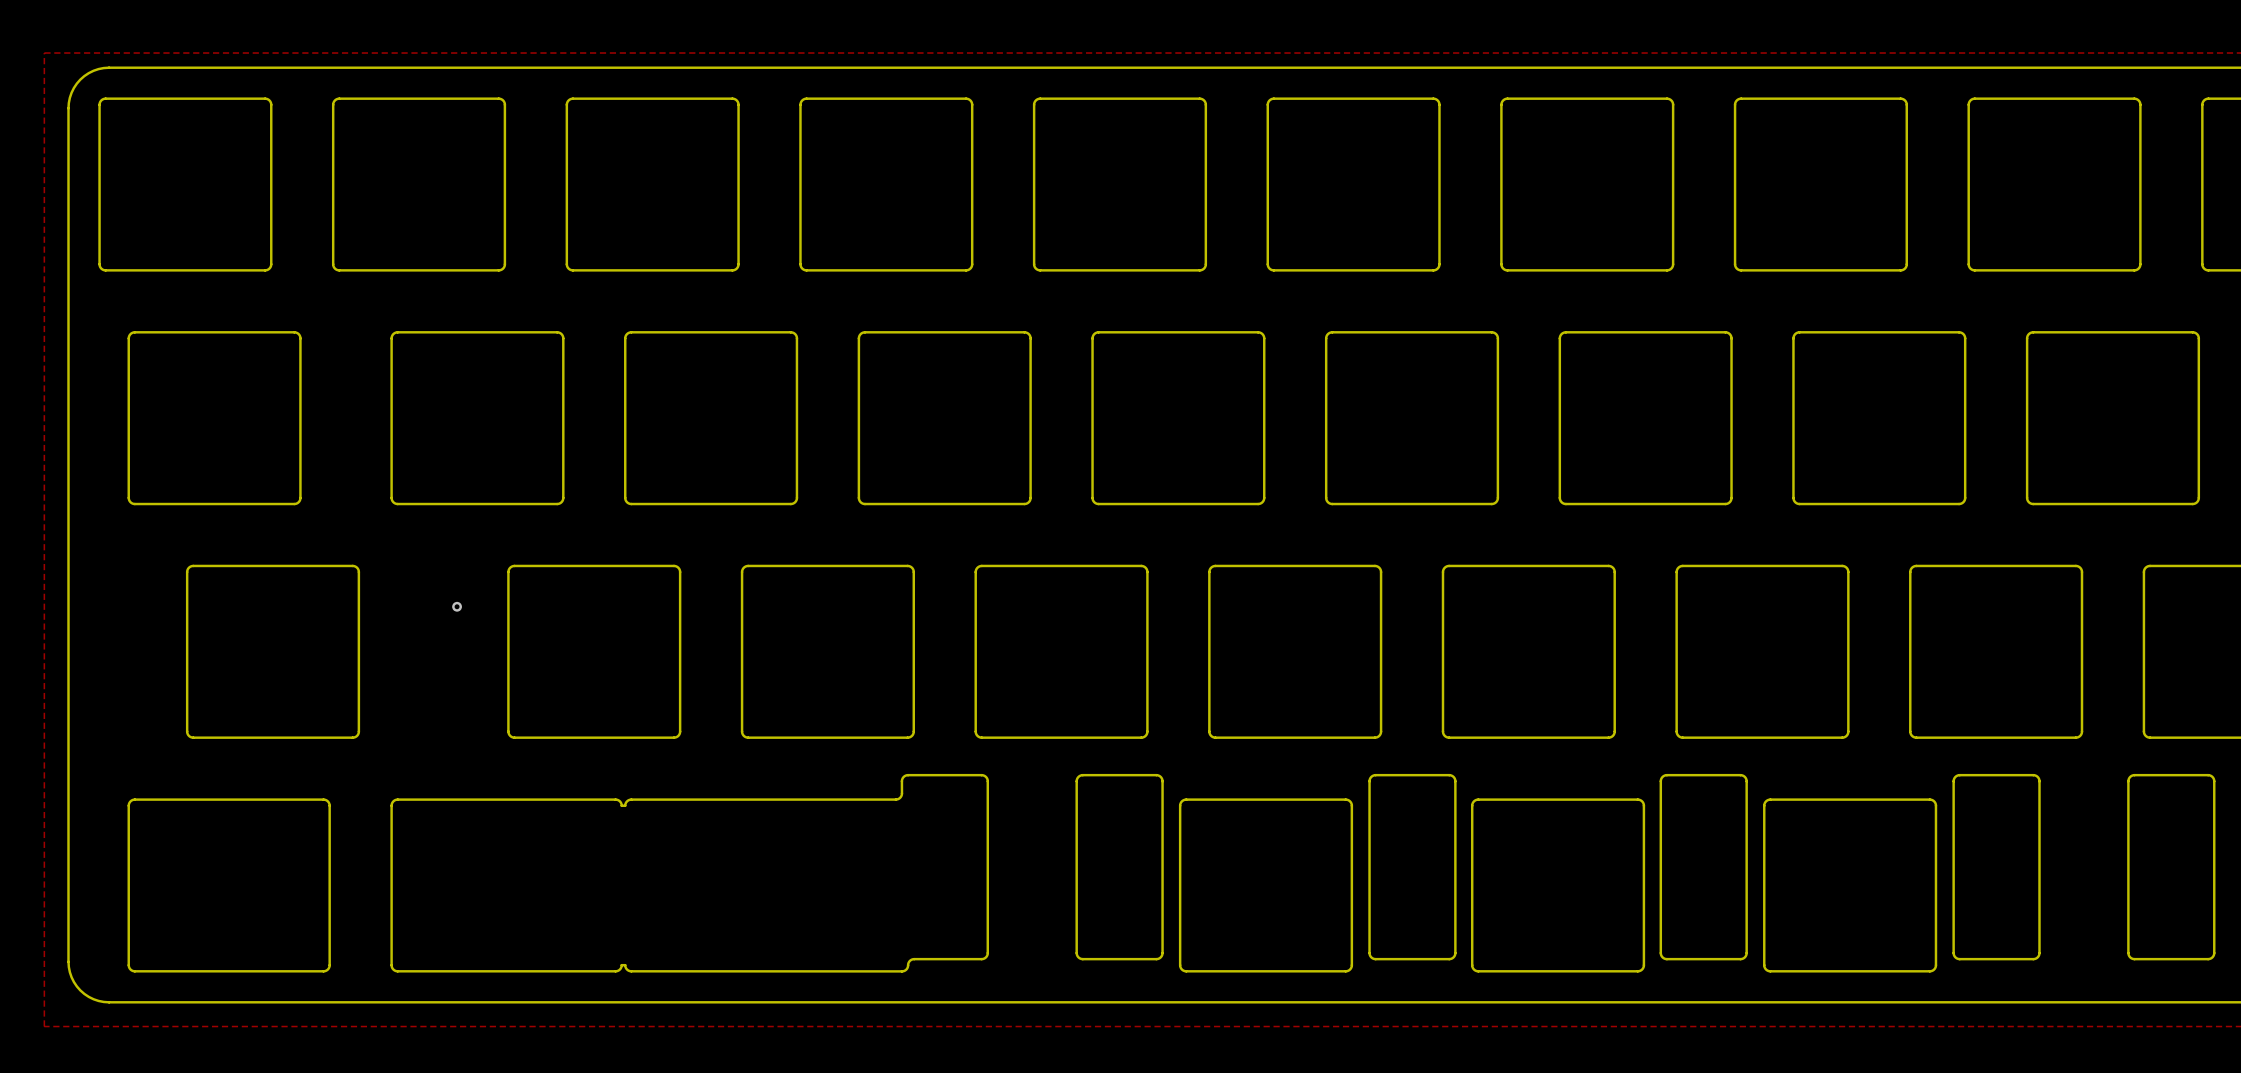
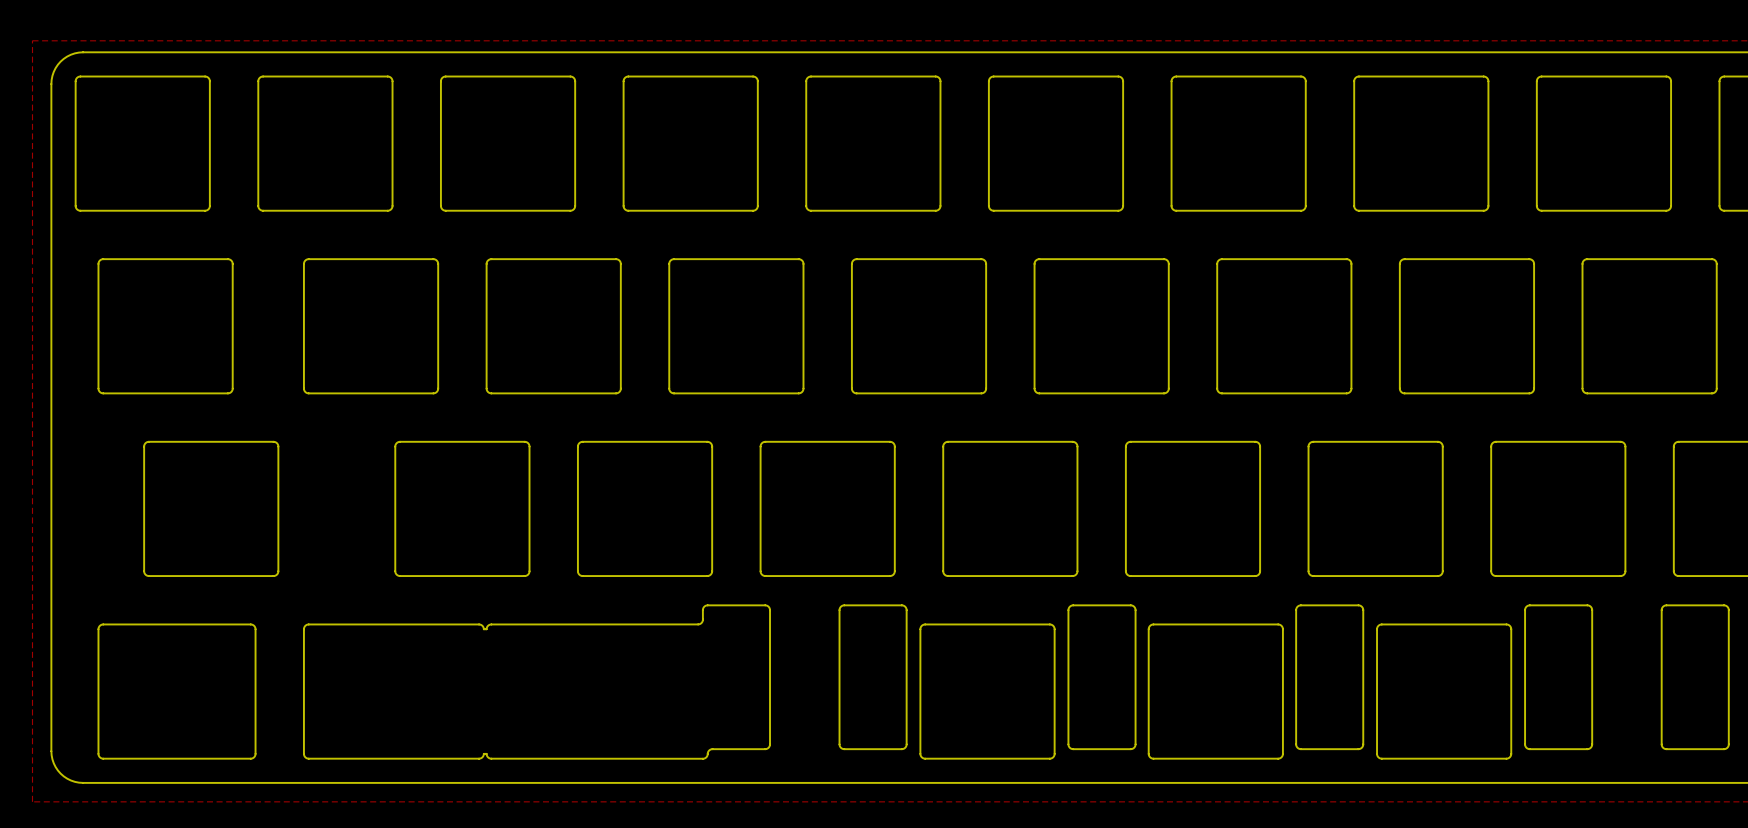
via: (457, 606) -> none

